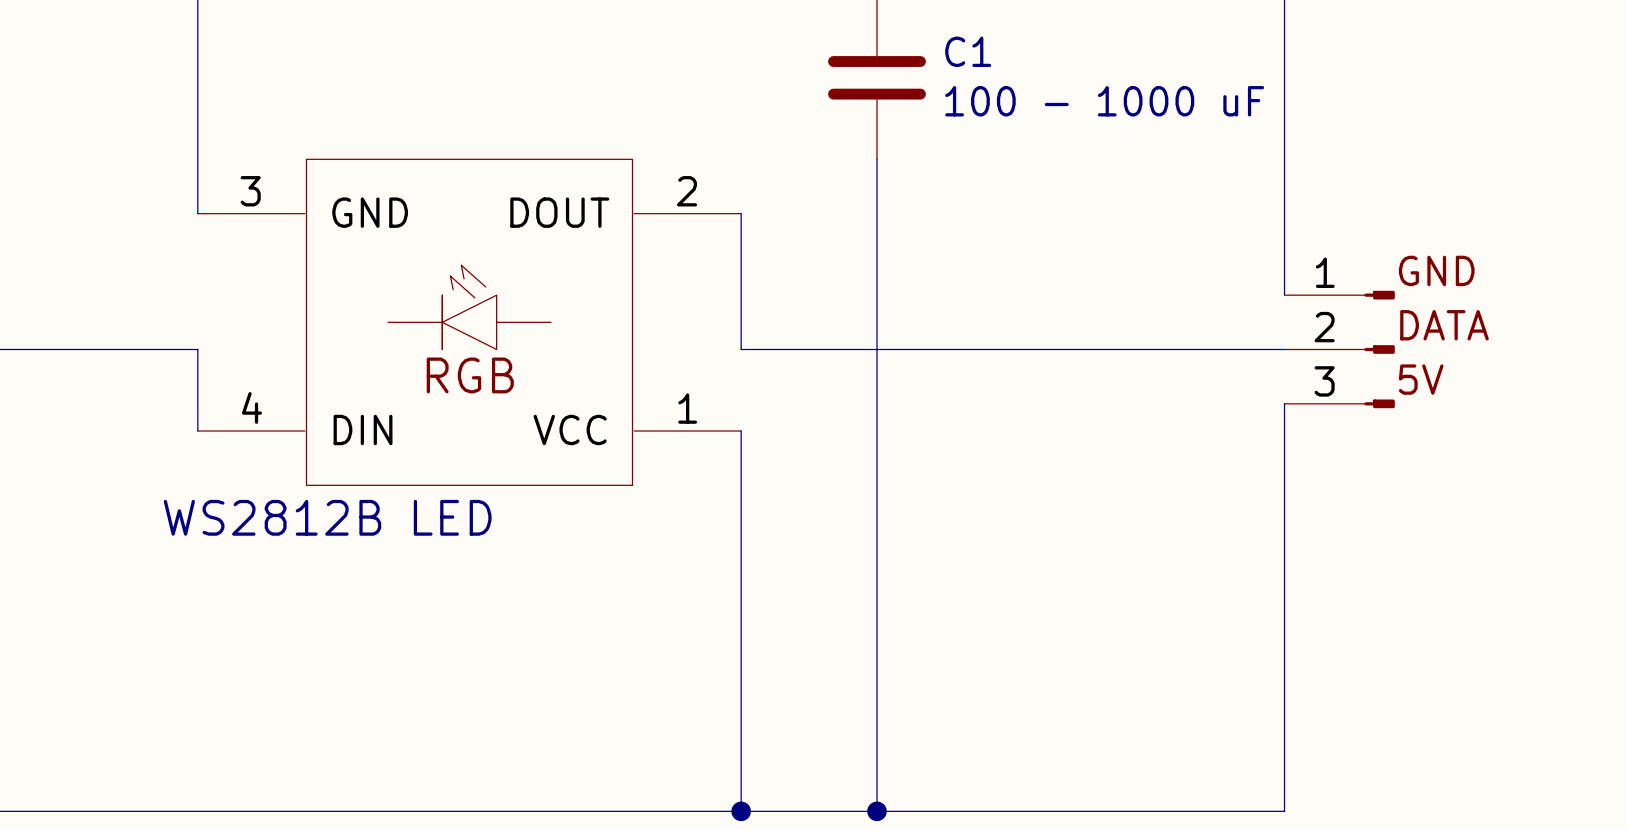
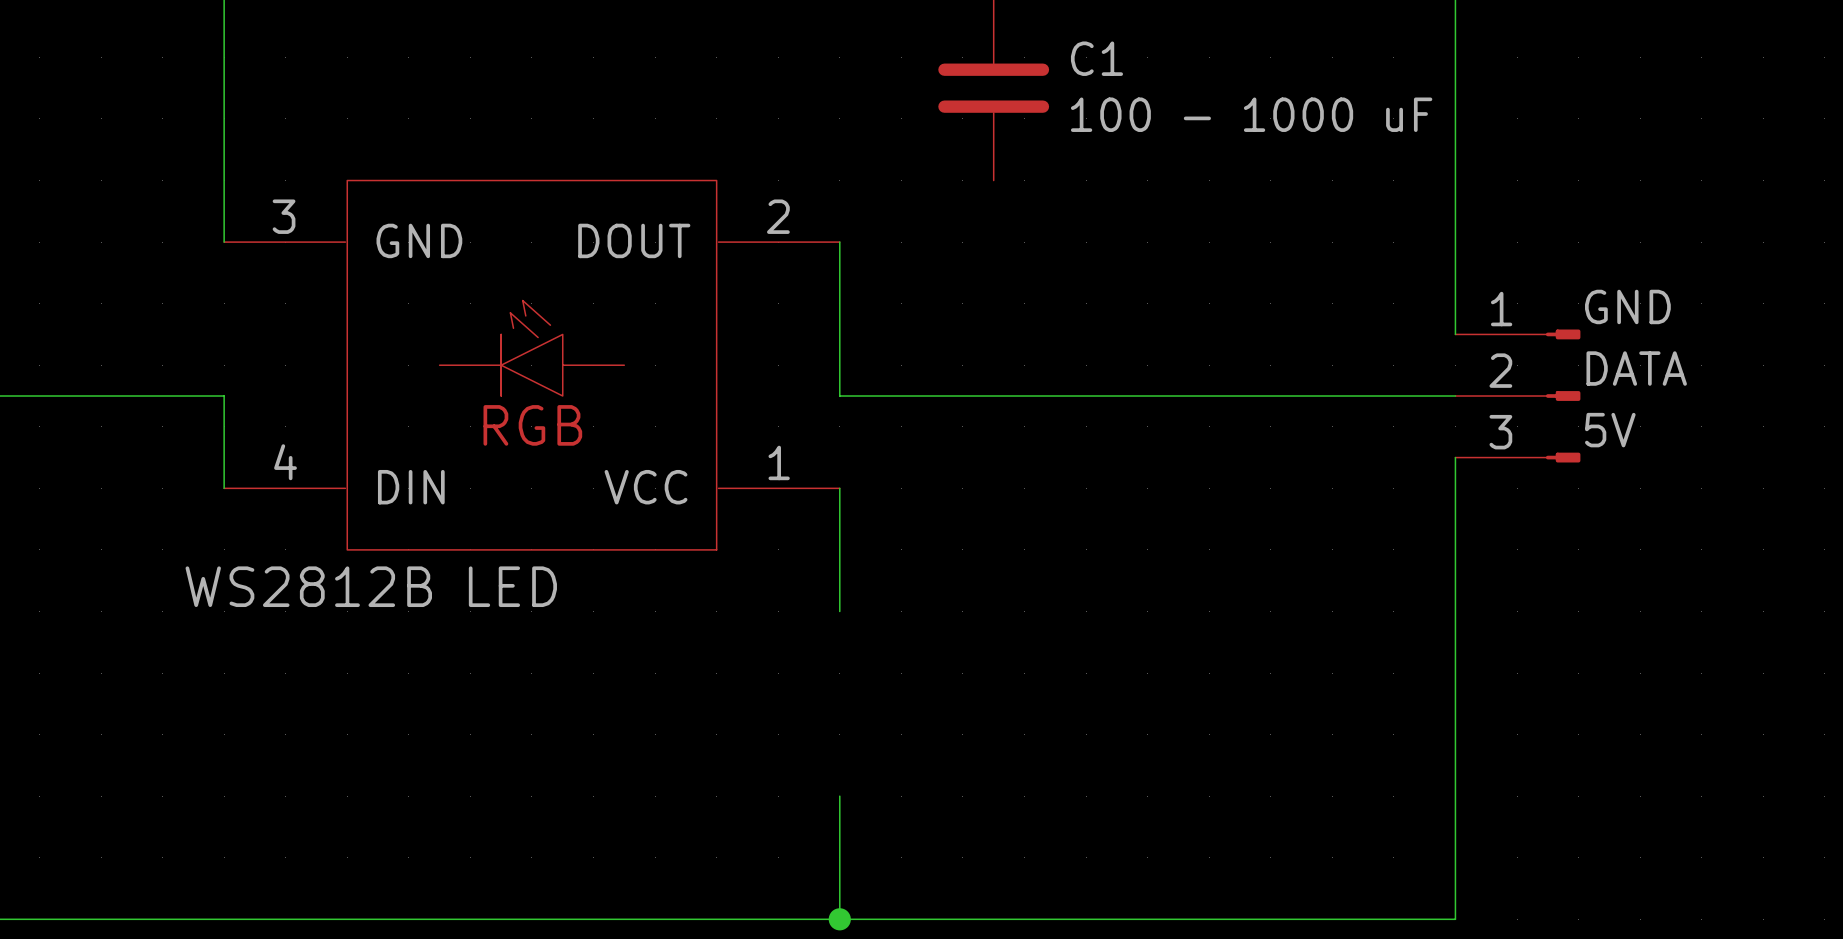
wire: (877, 159) (877, 811) -> none
wire: (741, 539) (741, 702) -> none
junction: (877, 811) -> none

